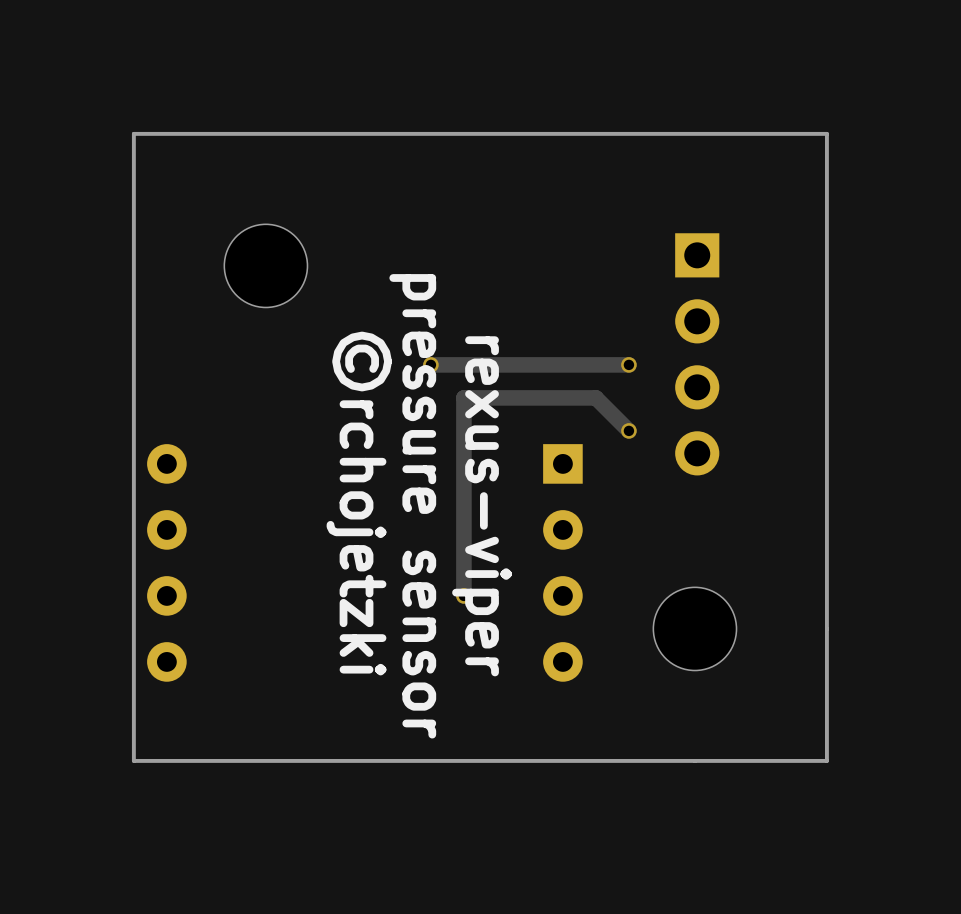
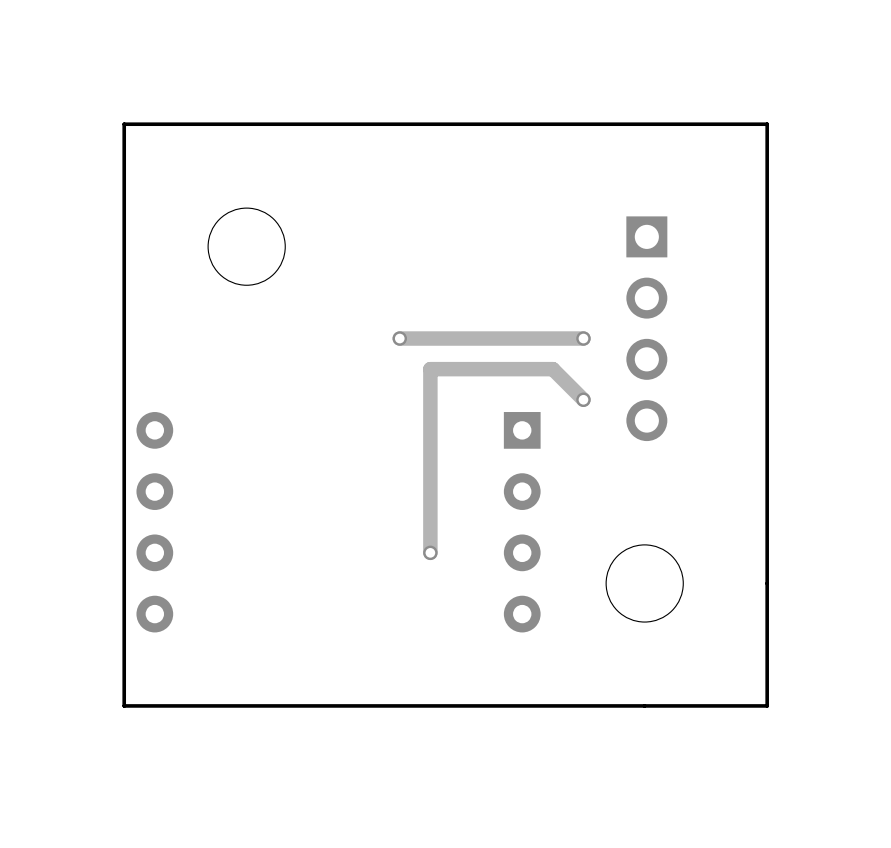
text: ©rchojetzki (359, 503) -> none
text: pressure sensor (412, 506) -> none
text: rexus-viper (482, 506) -> none

